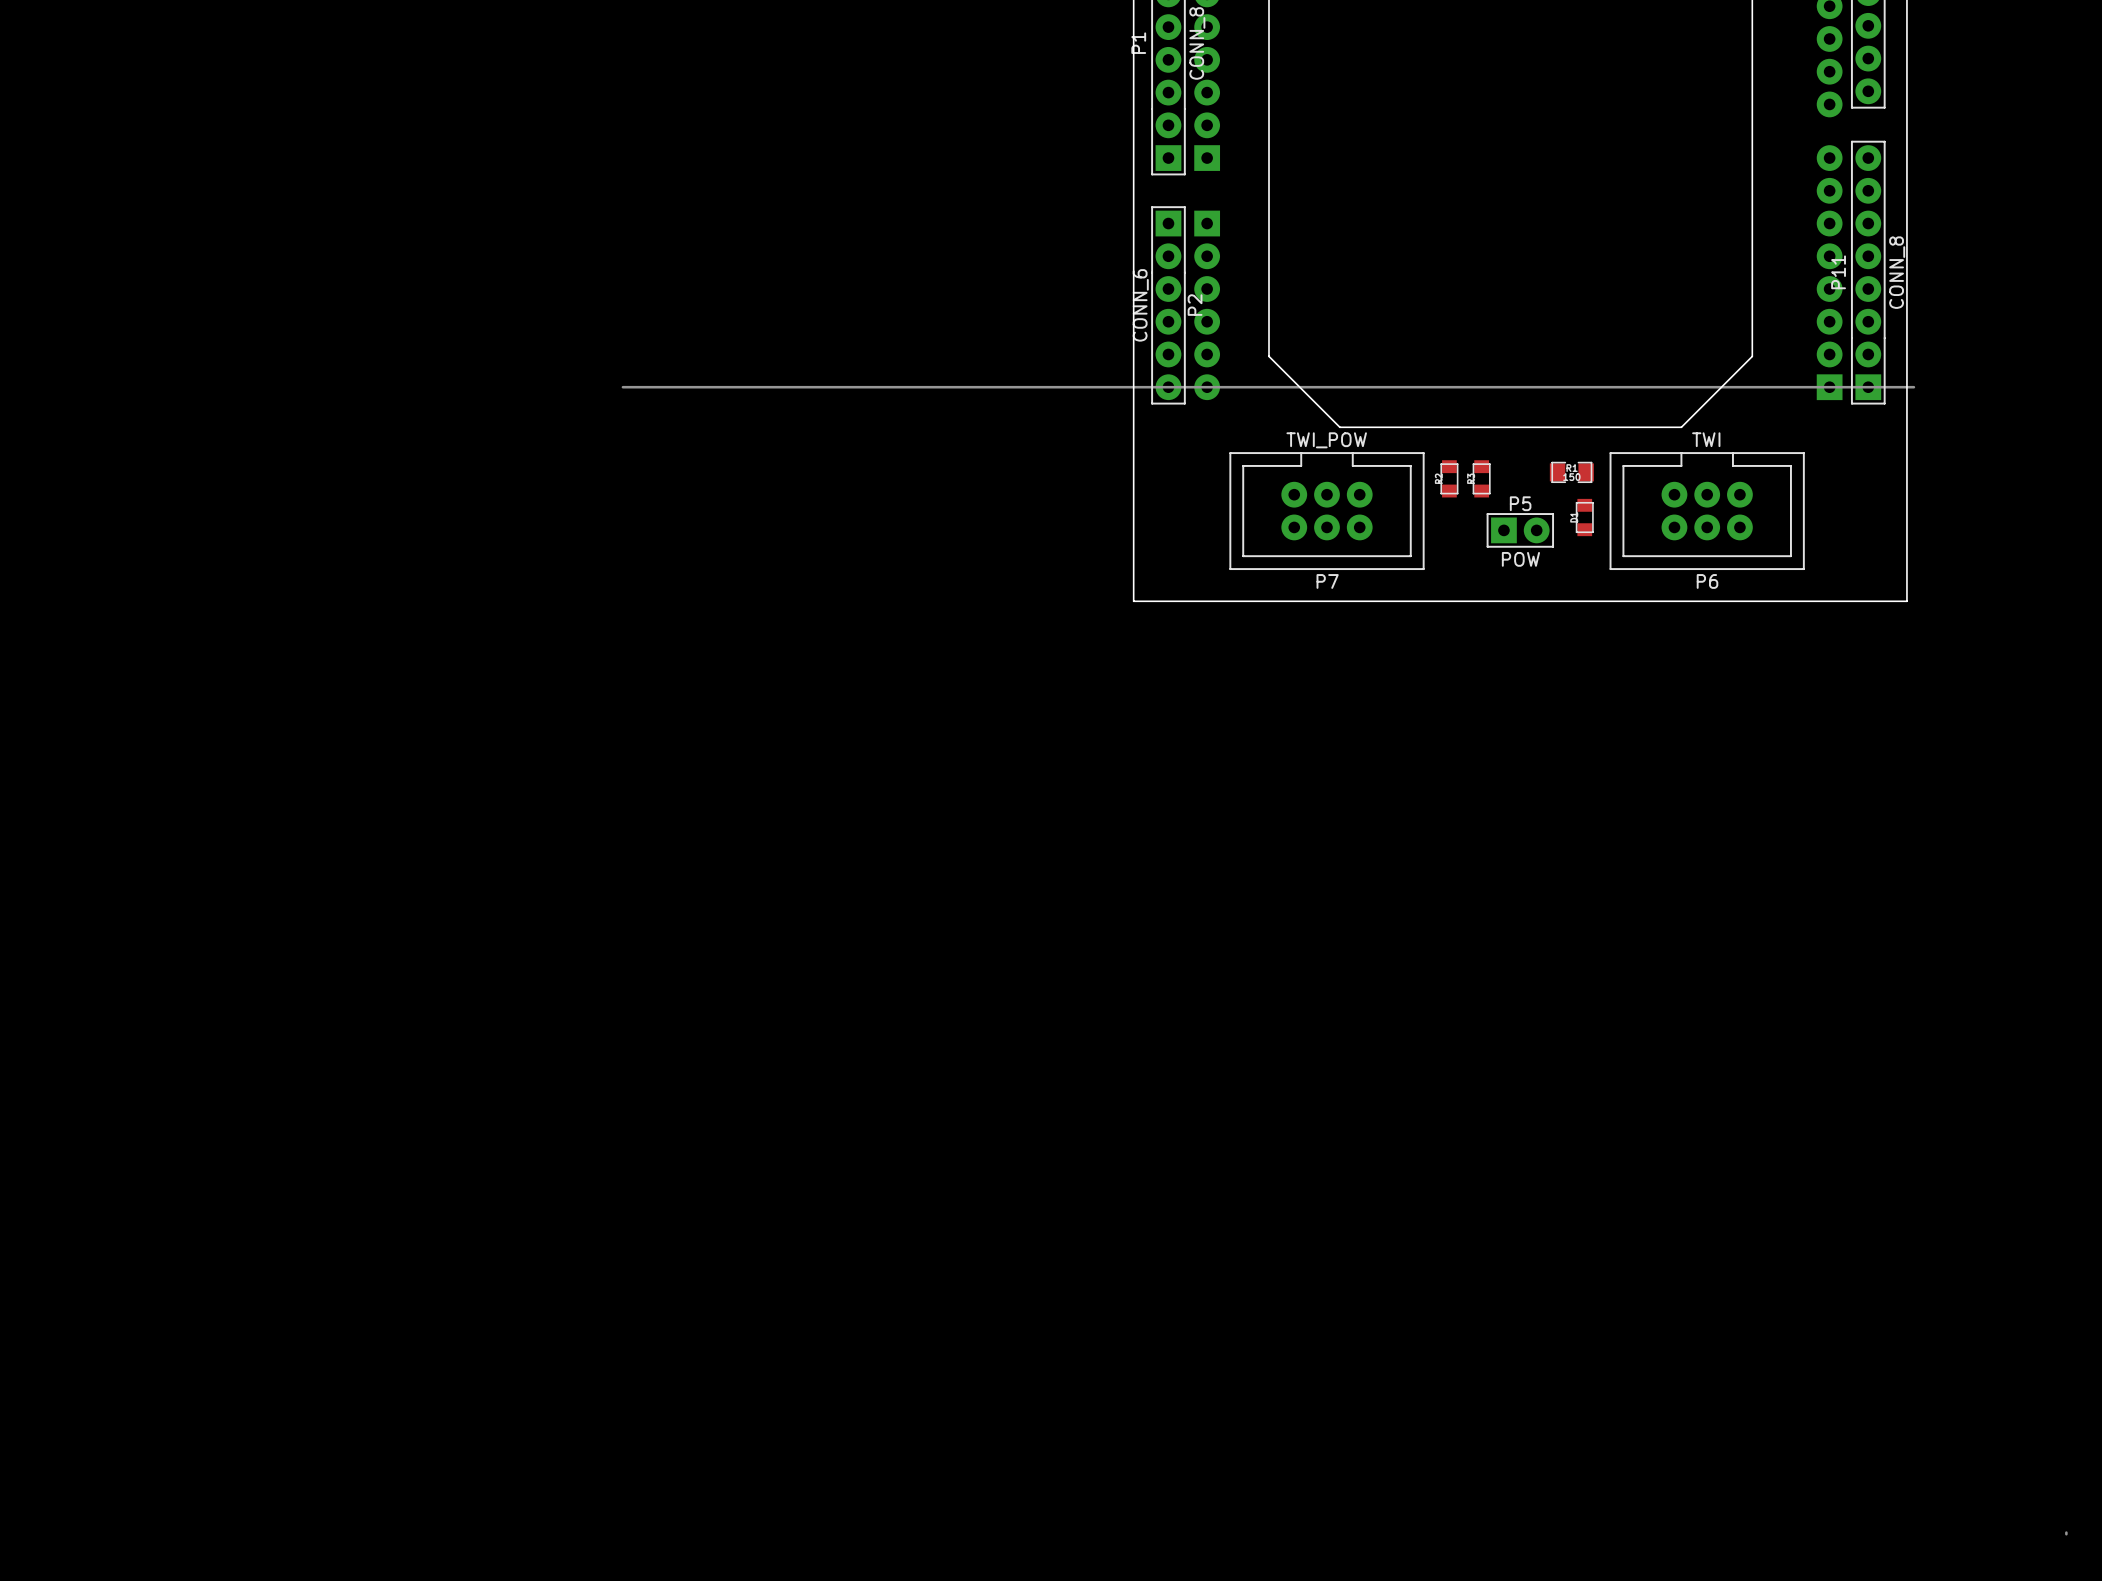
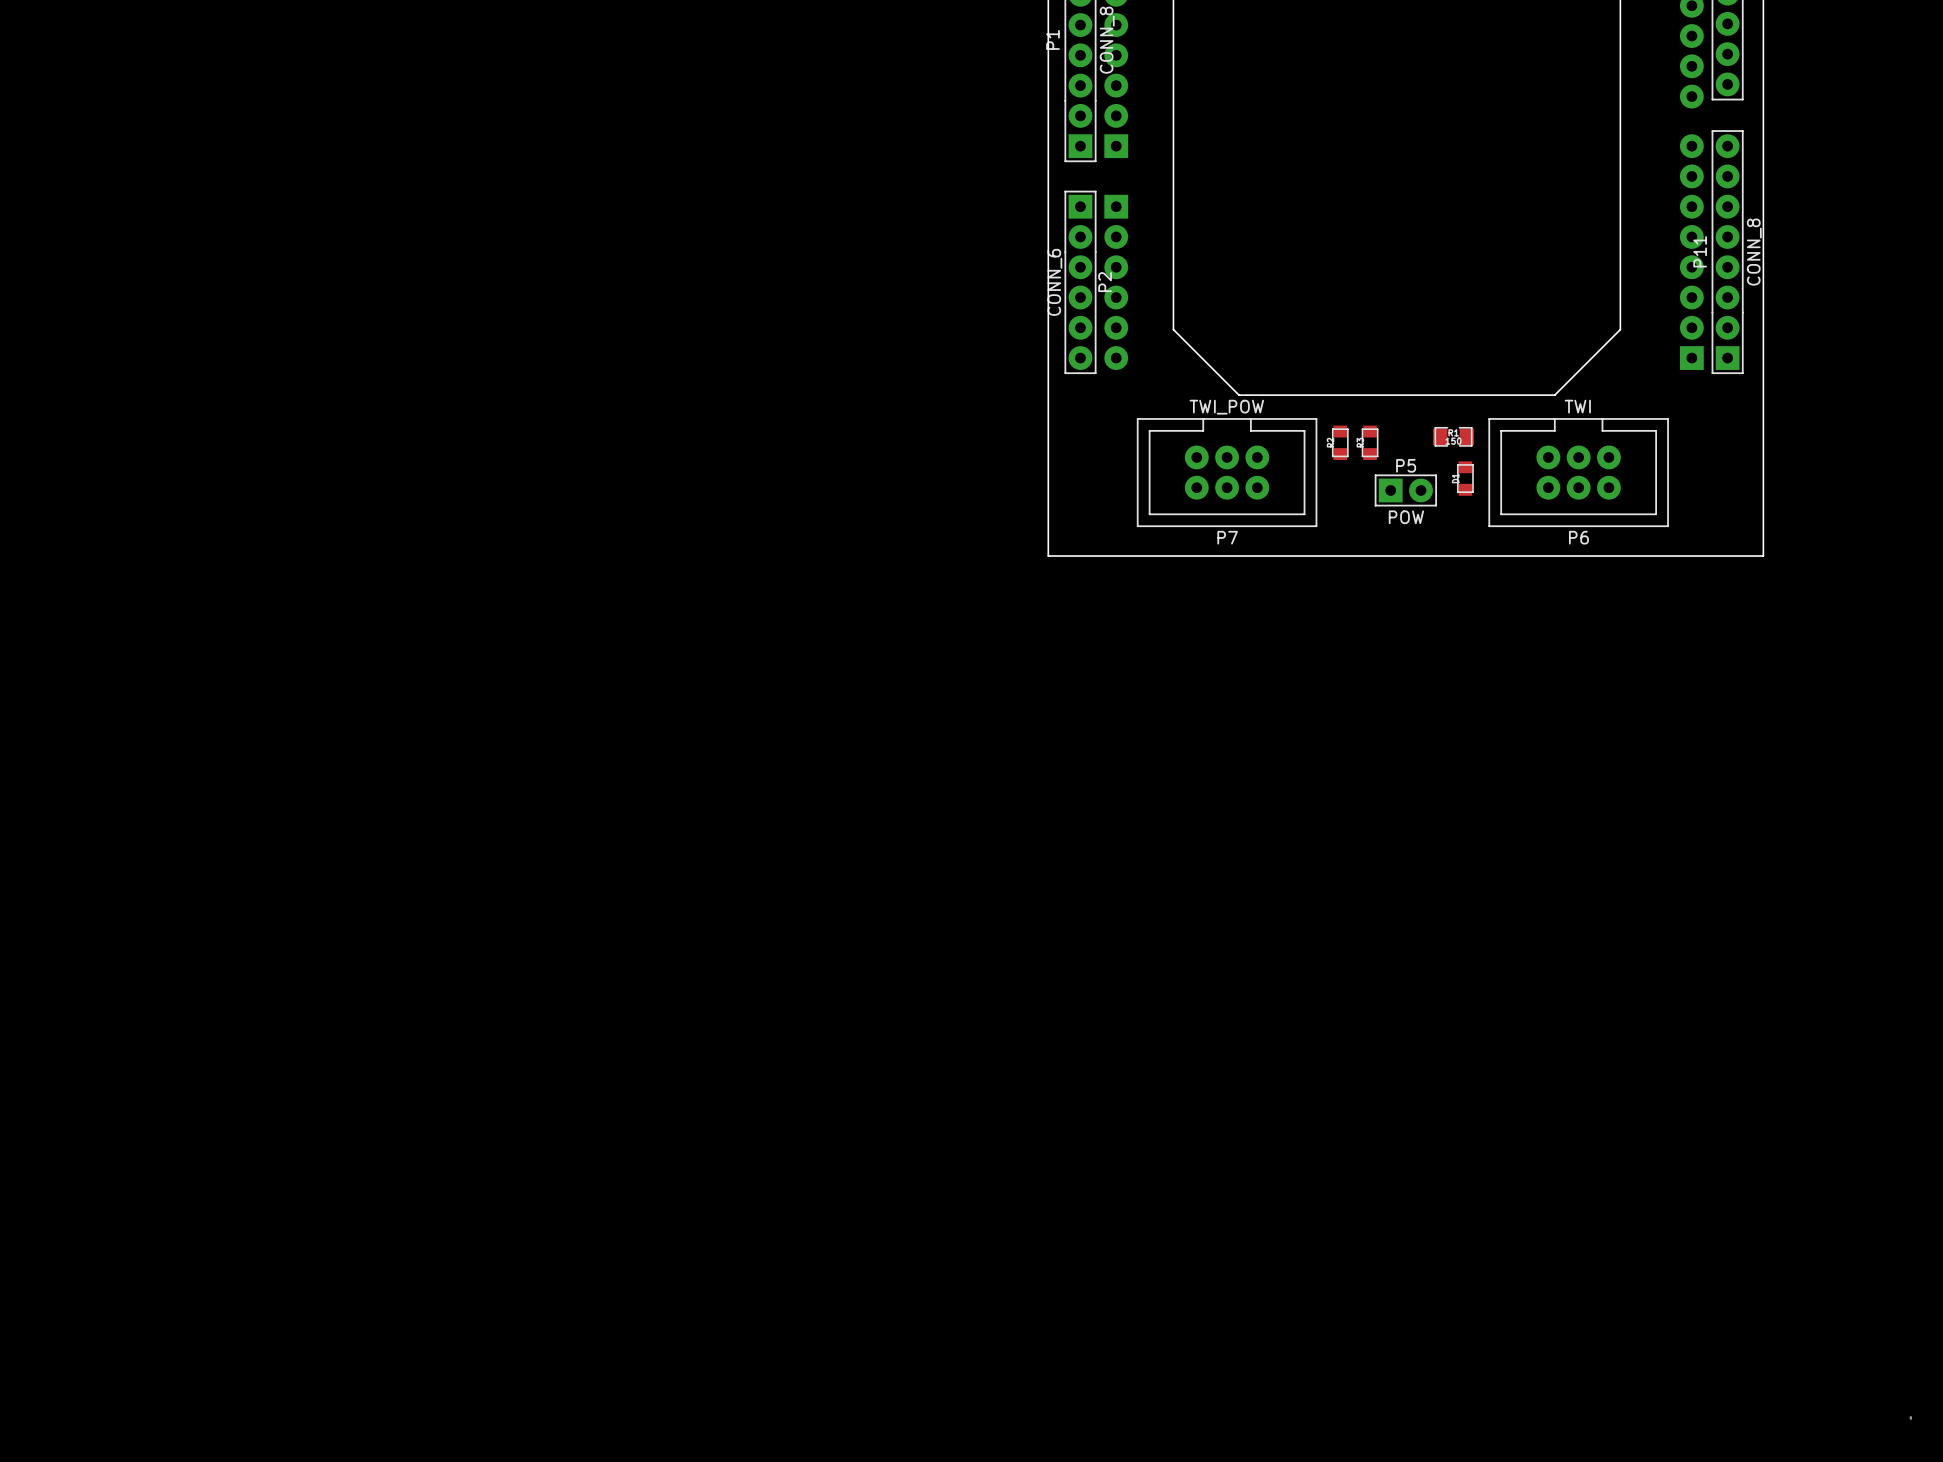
line: (622, 387) (1913, 387) -> none

